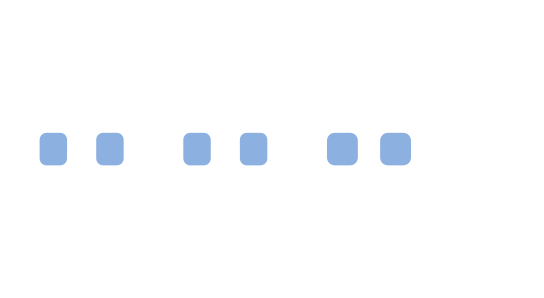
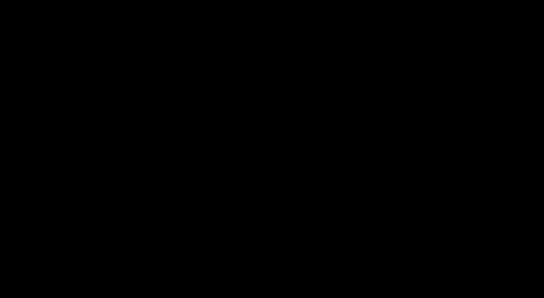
part: (81, 149) -> none
part: (225, 149) -> none
part: (368, 149) -> none

